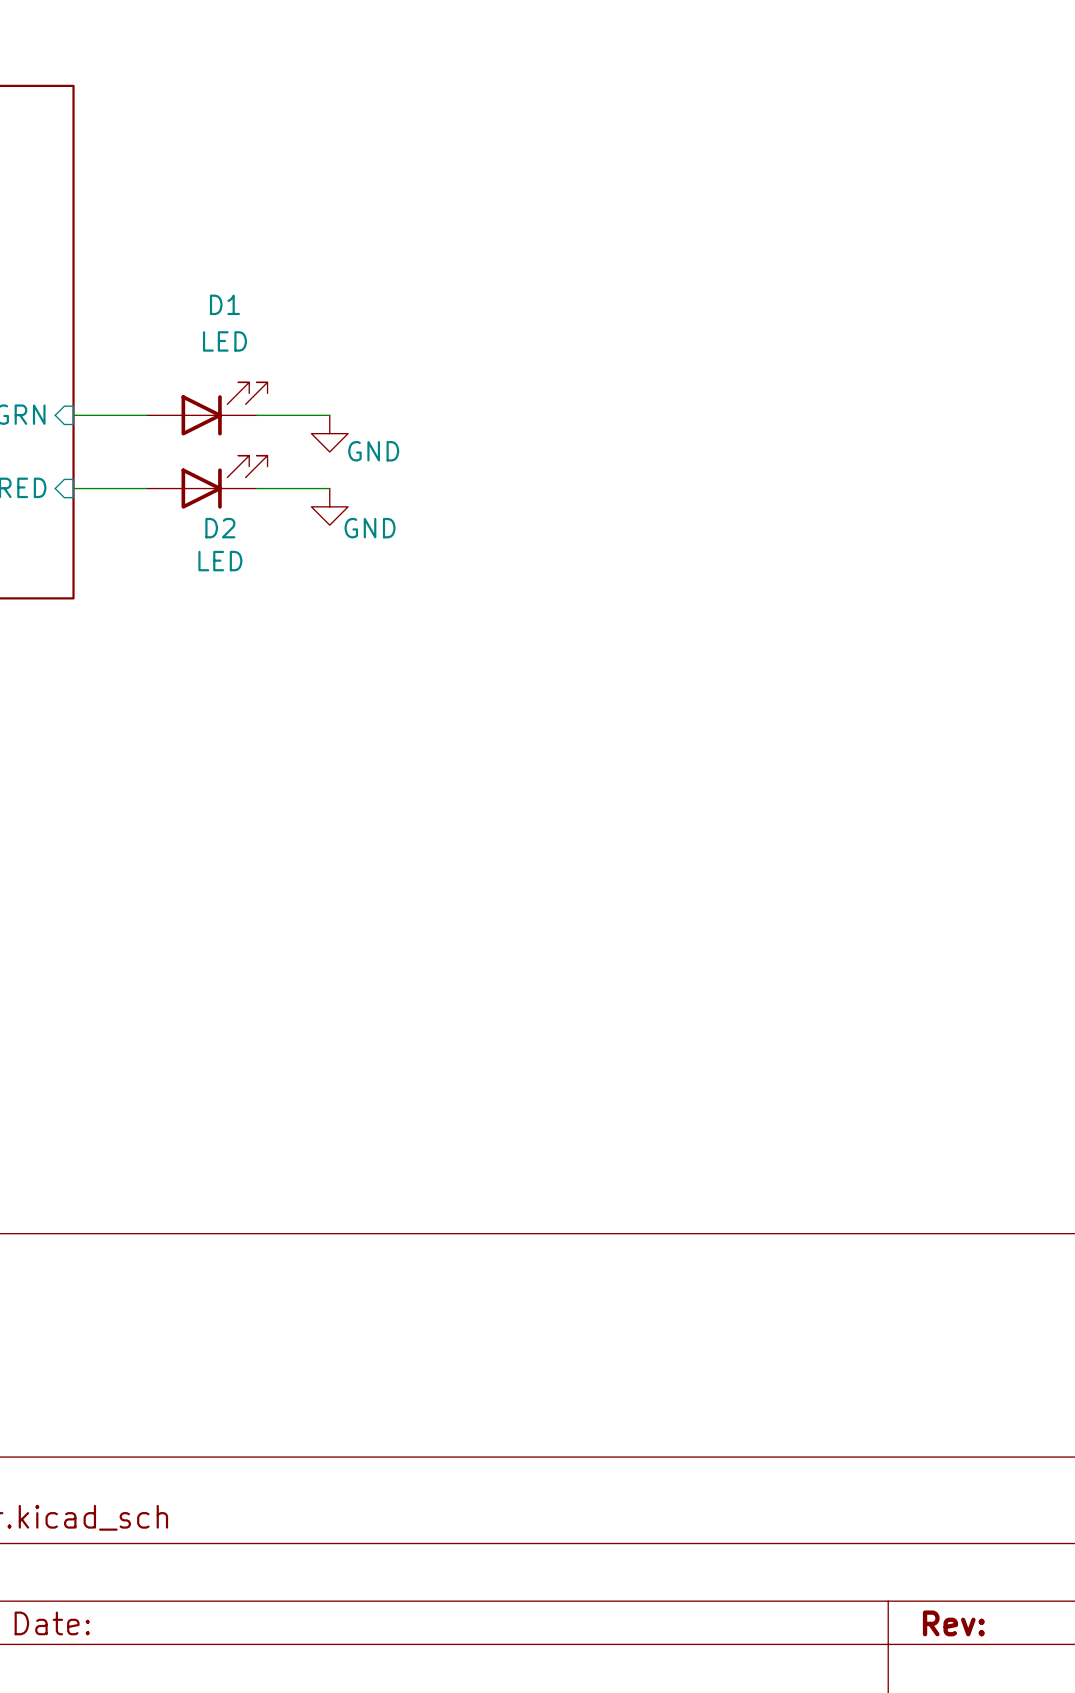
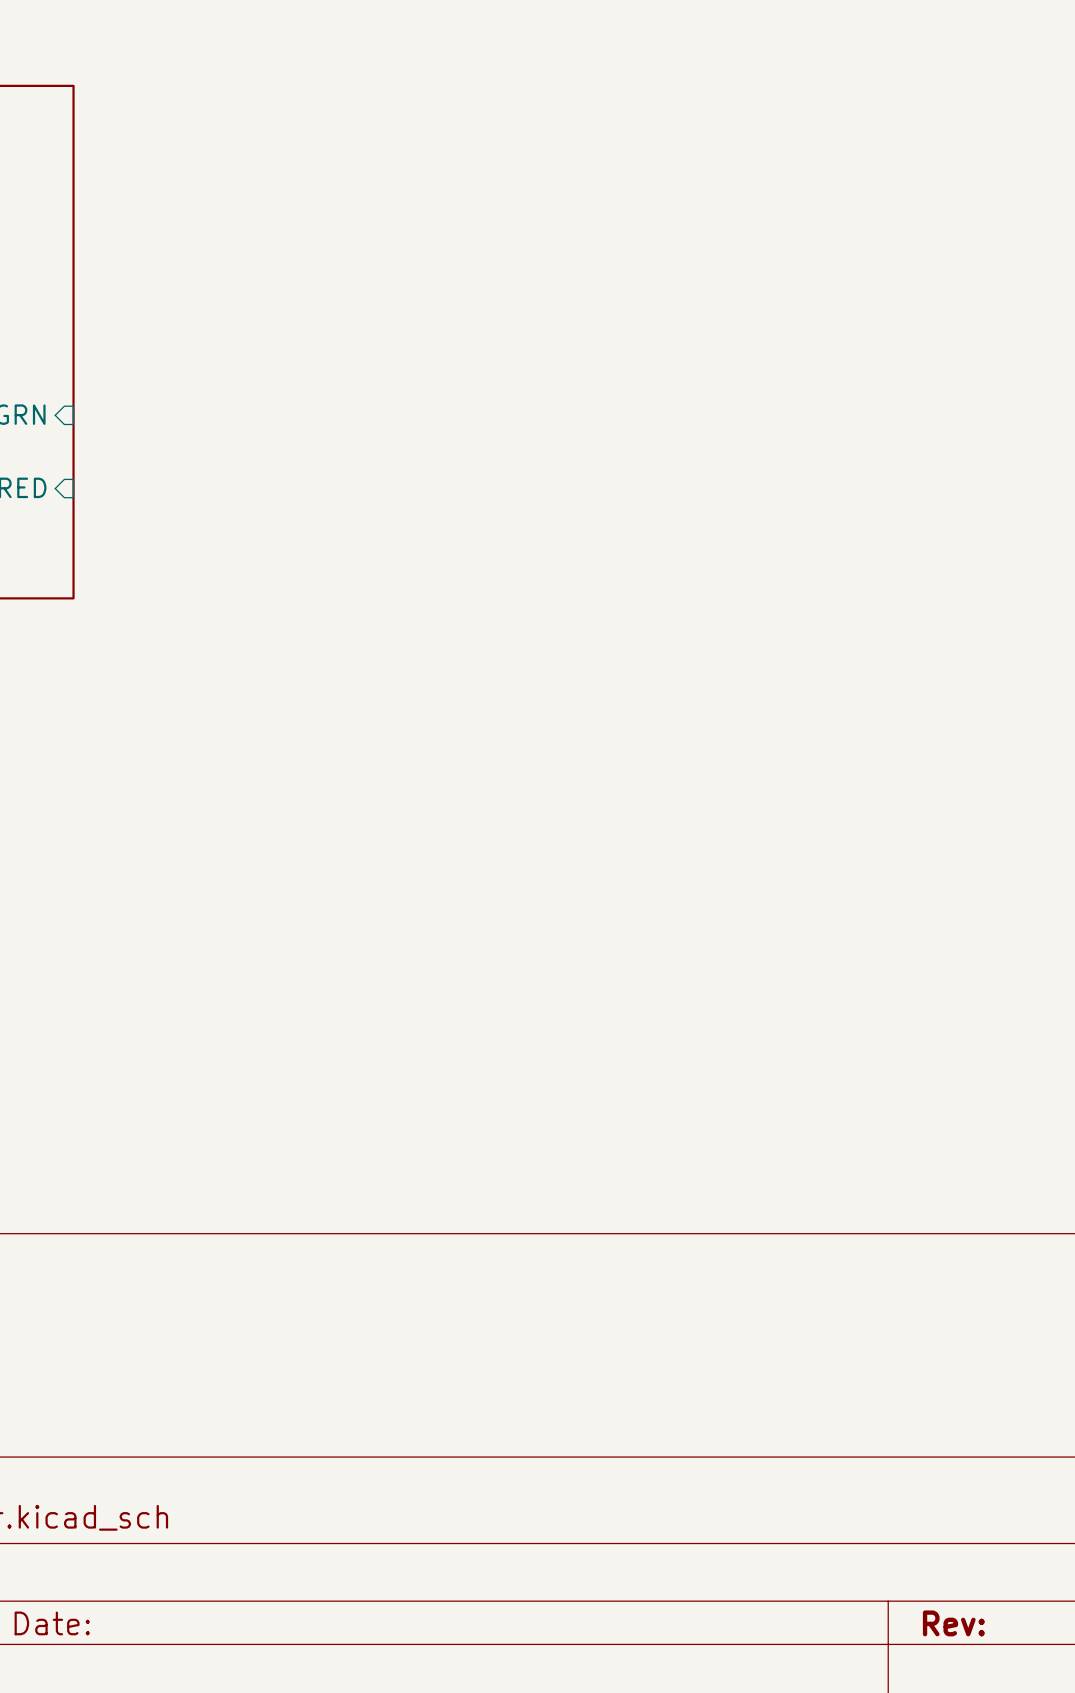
D1: LED (207, 408) -> none
wire: (73, 415) (146, 415) -> none
wire: (256, 415) (329, 415) -> none
power symbol: GND (329, 433) -> none
D2: LED (207, 482) -> none
wire: (73, 488) (146, 488) -> none
wire: (256, 488) (329, 488) -> none
power symbol: GND (329, 506) -> none

